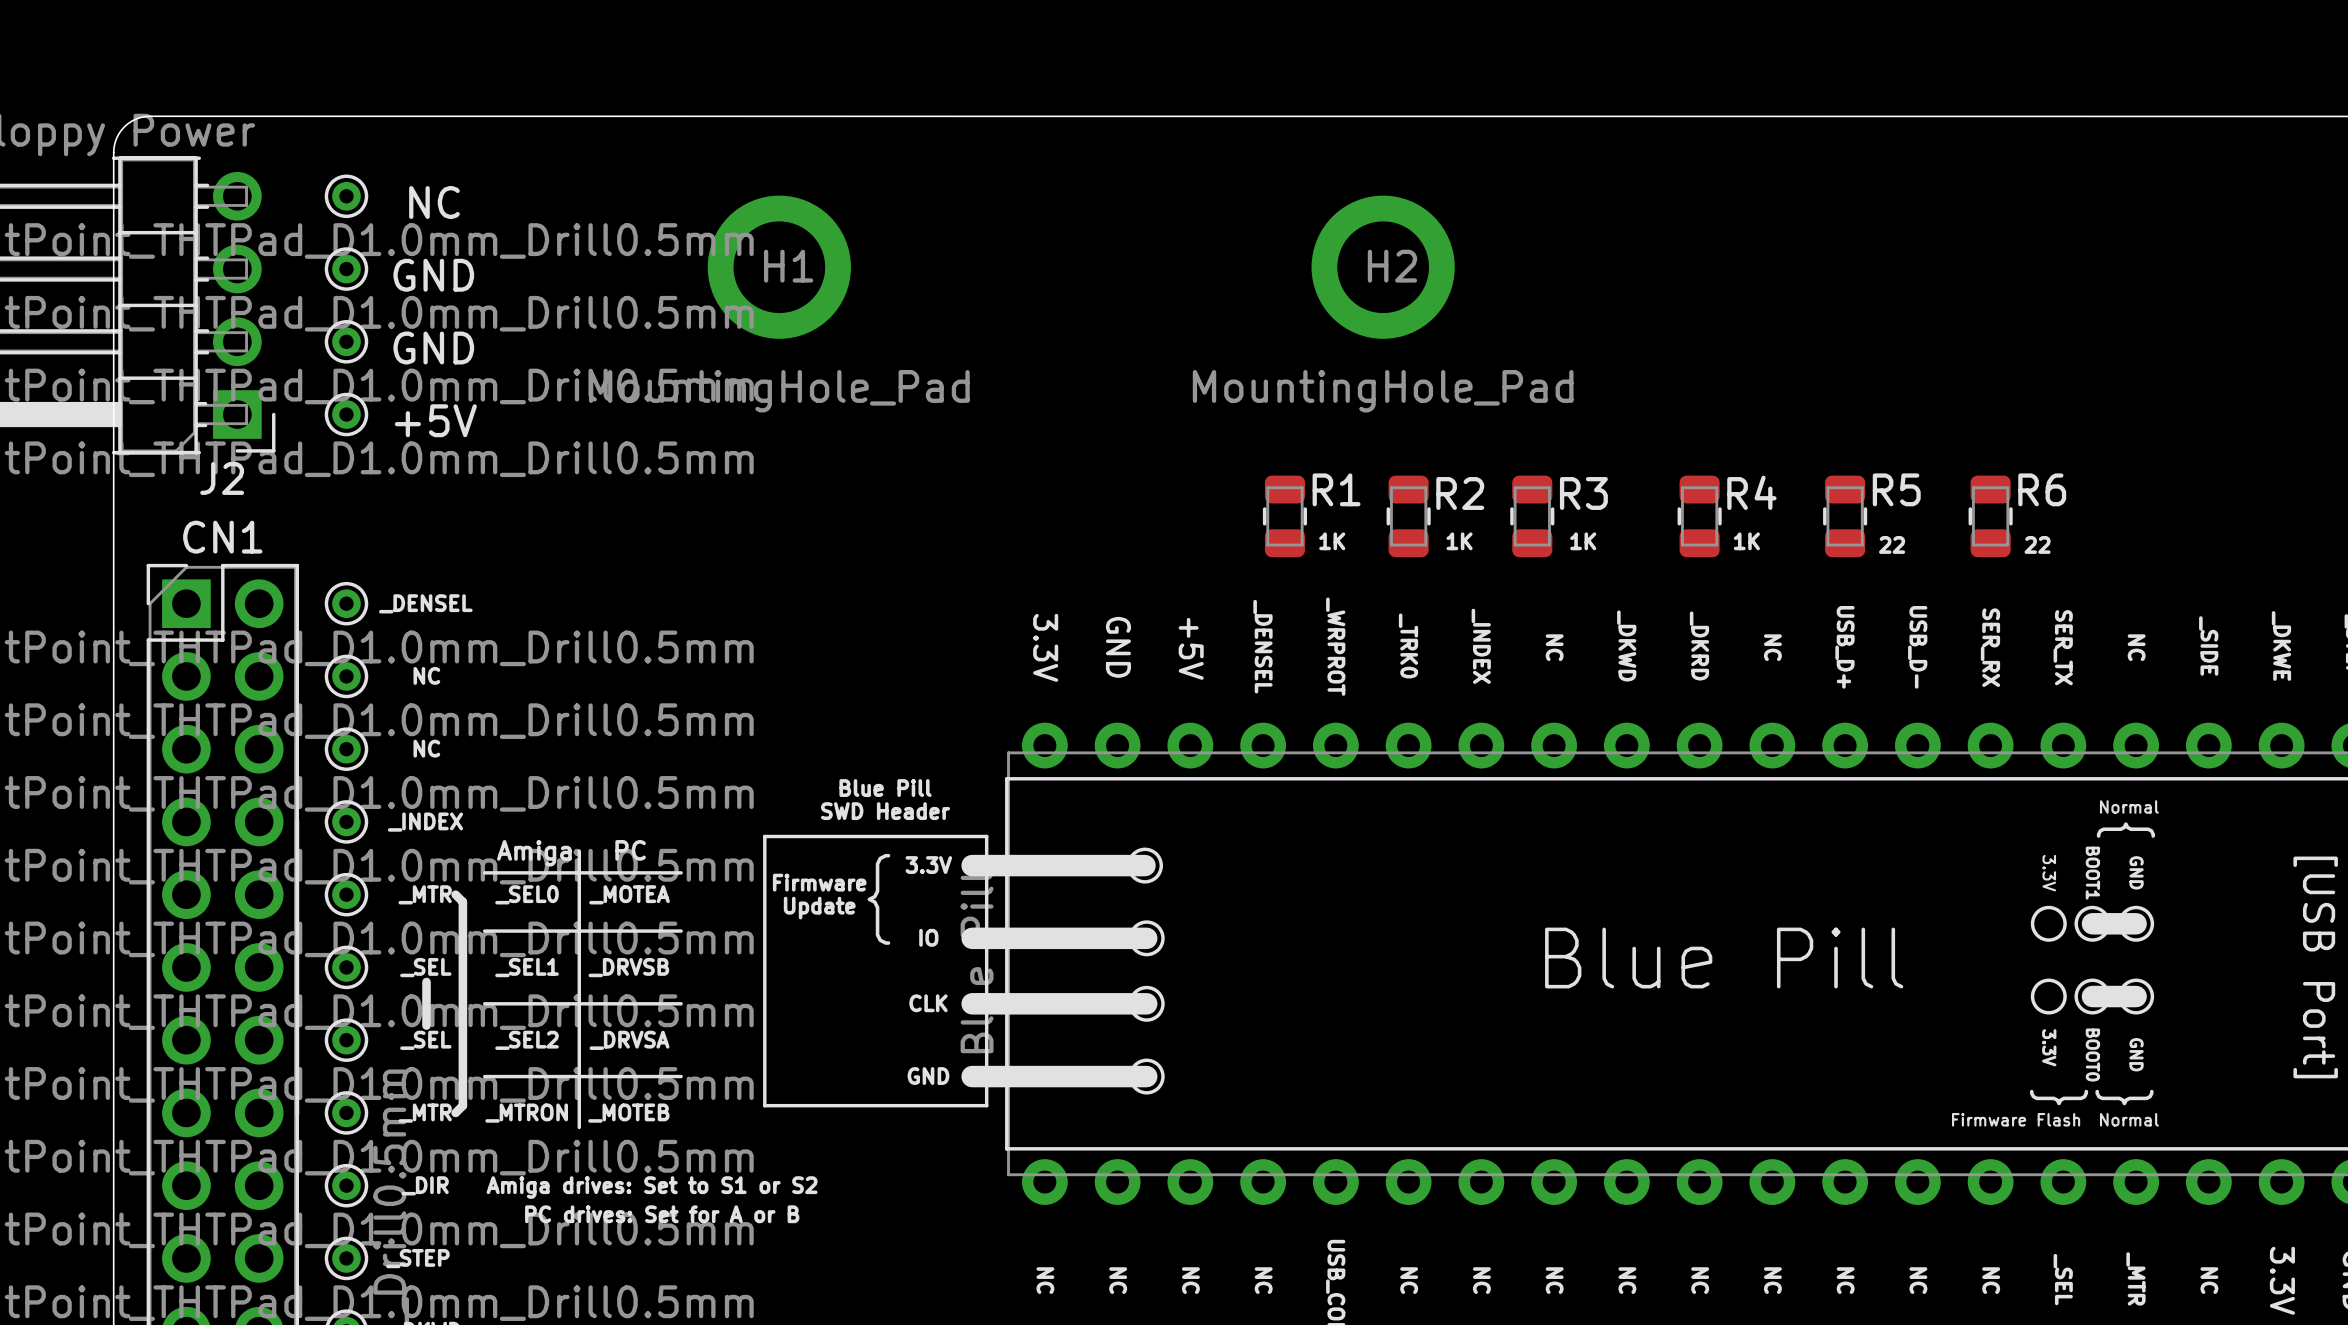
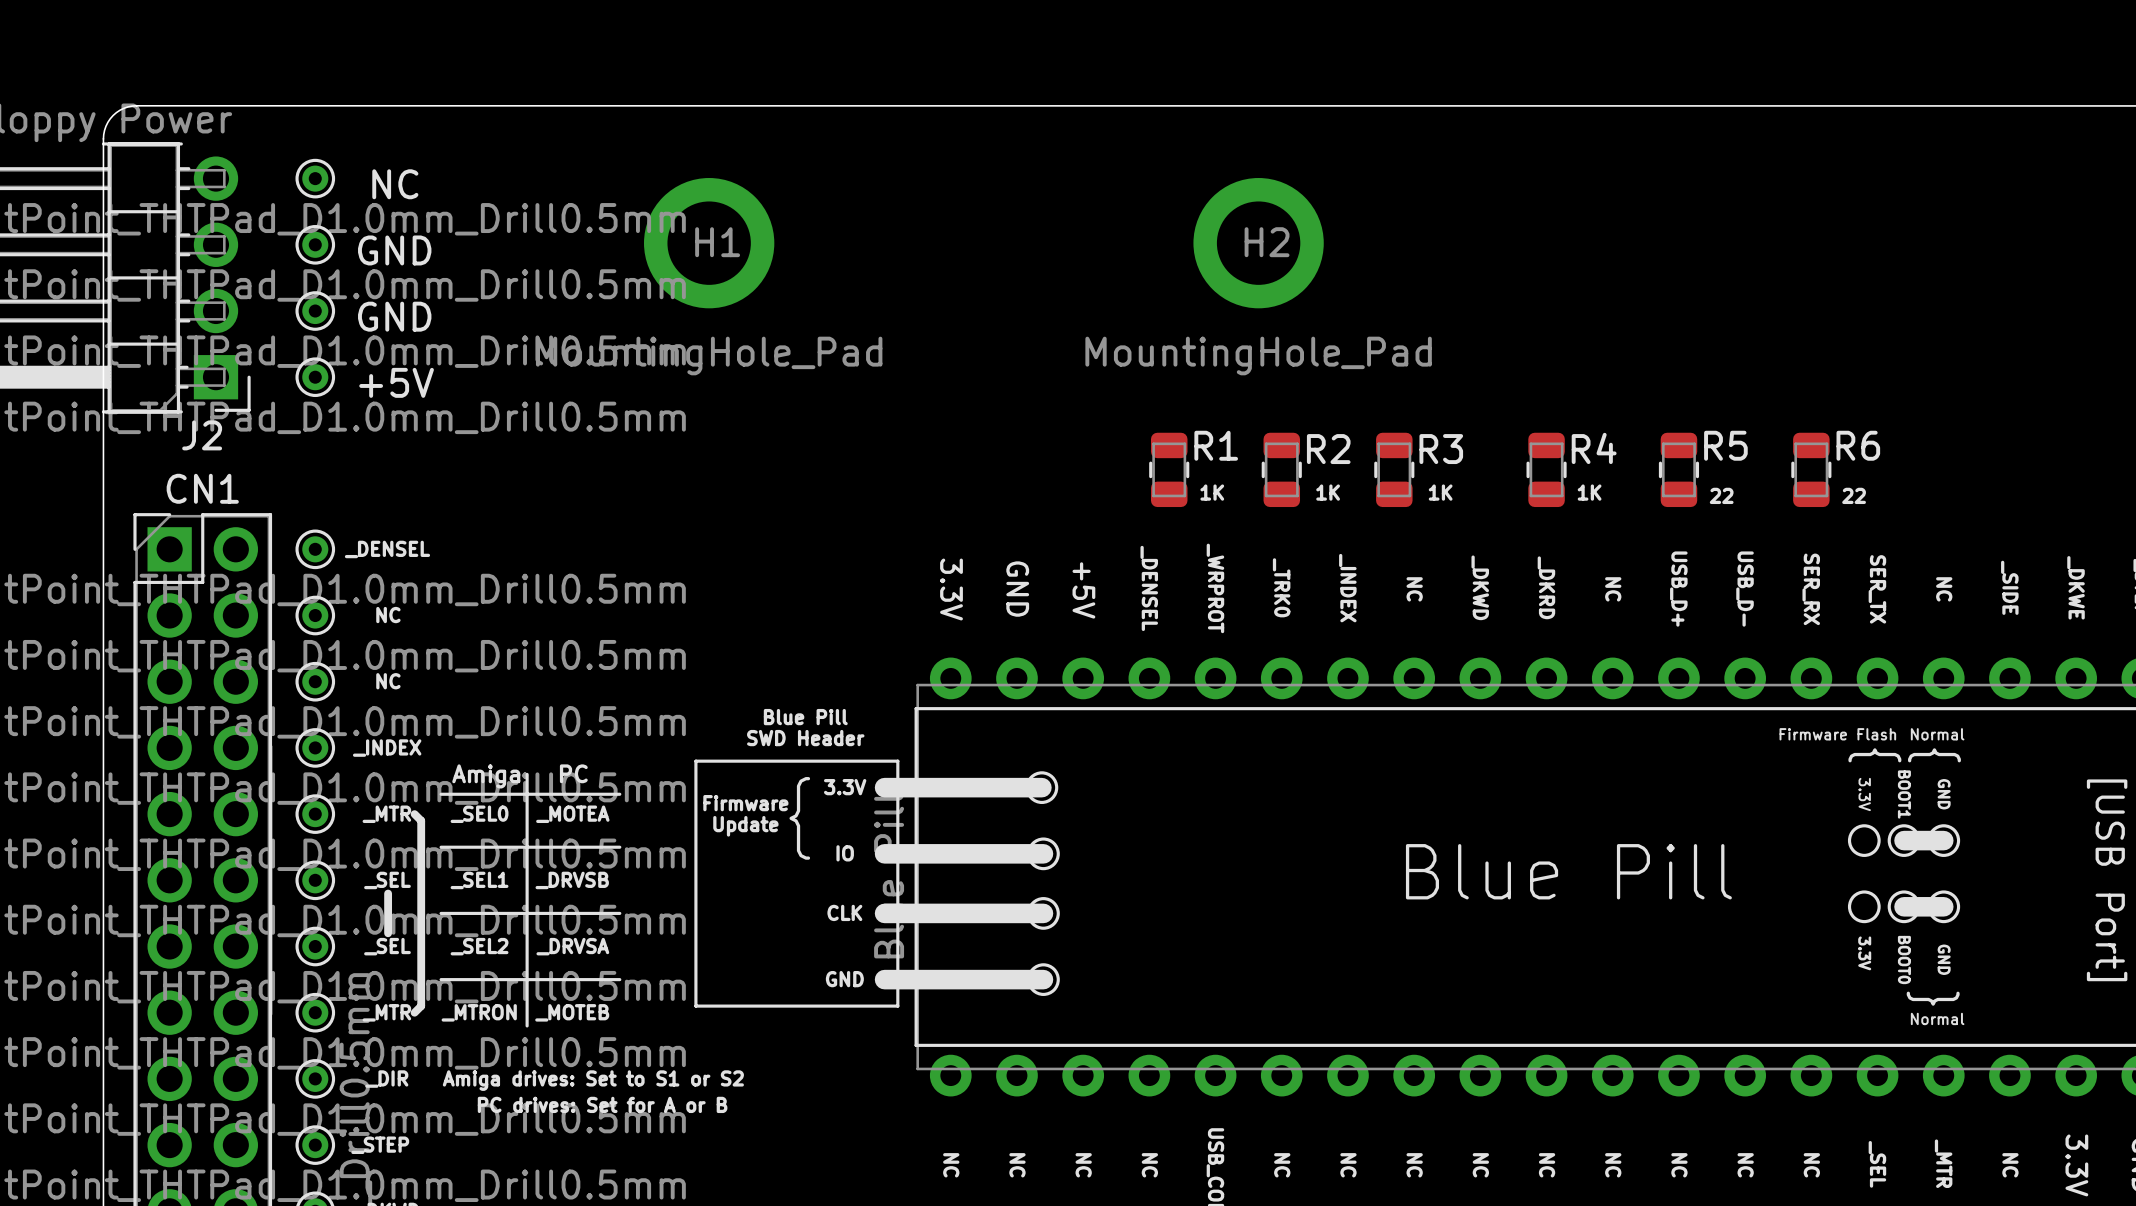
text rotation: 0° (2059, 1097) -> 180° (1874, 755)
text position: { (2059, 1097) -> { (1874, 755)
text position: Firmware Flash (2016, 1119) -> Firmware Flash (1837, 734)

